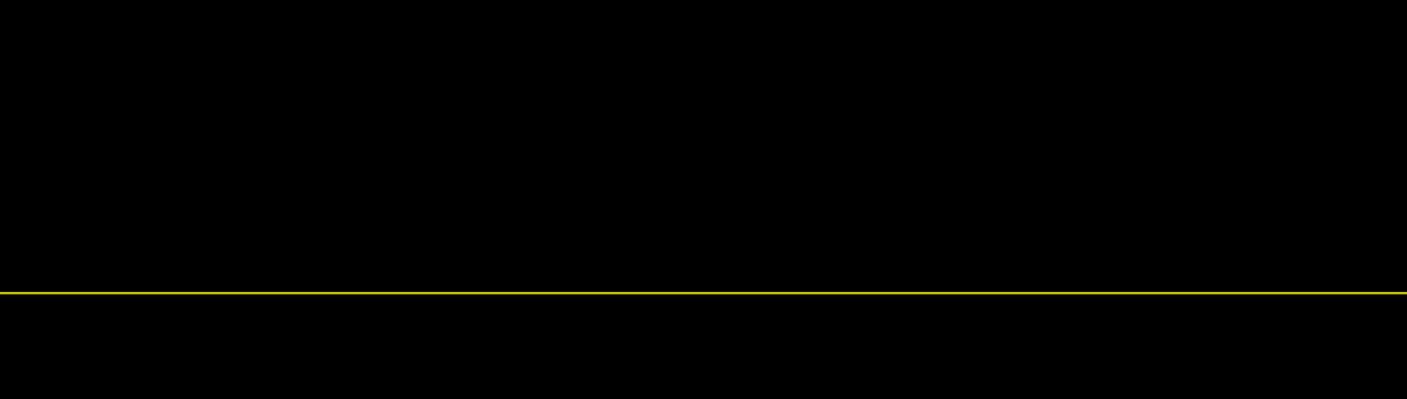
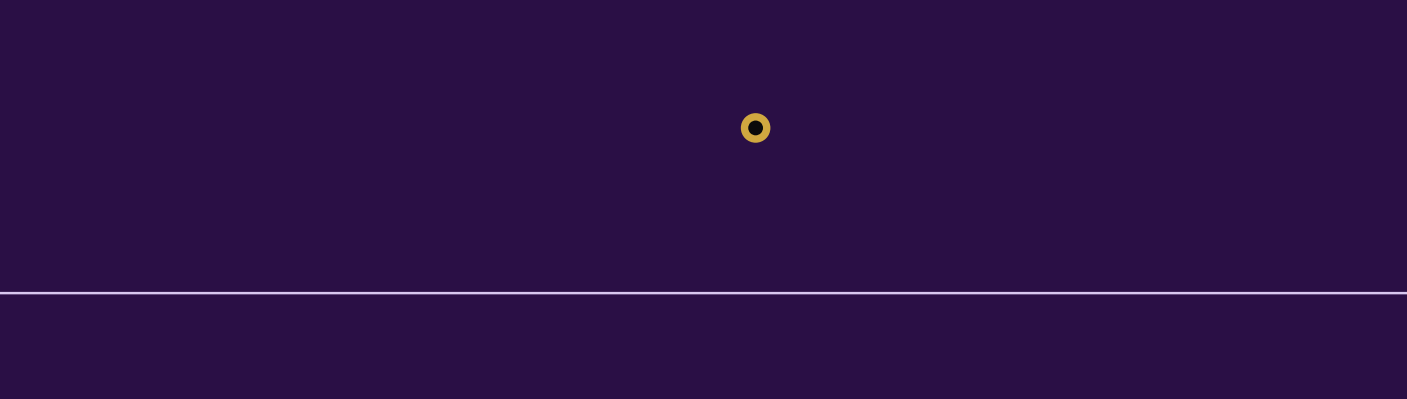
via: none -> (755, 127)

